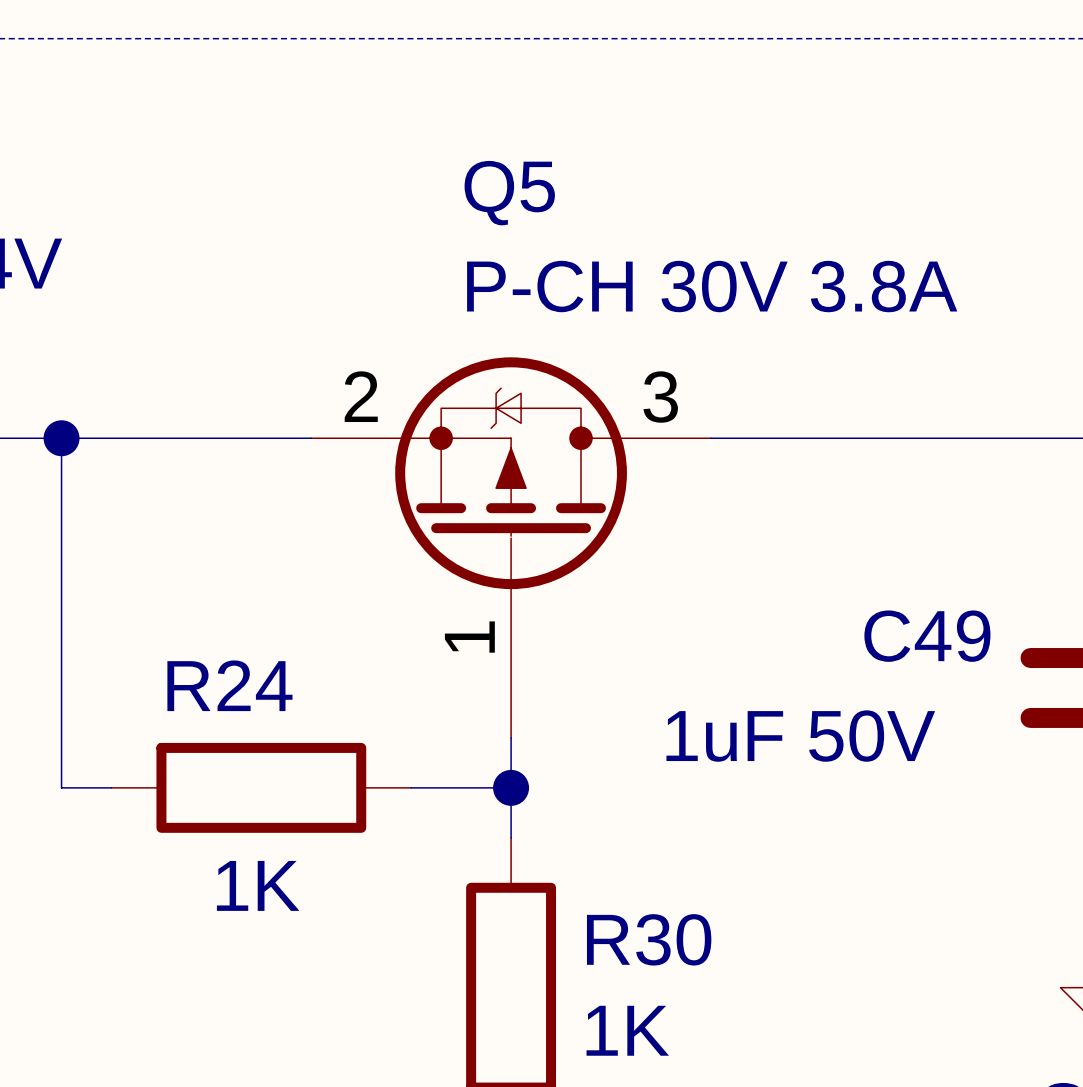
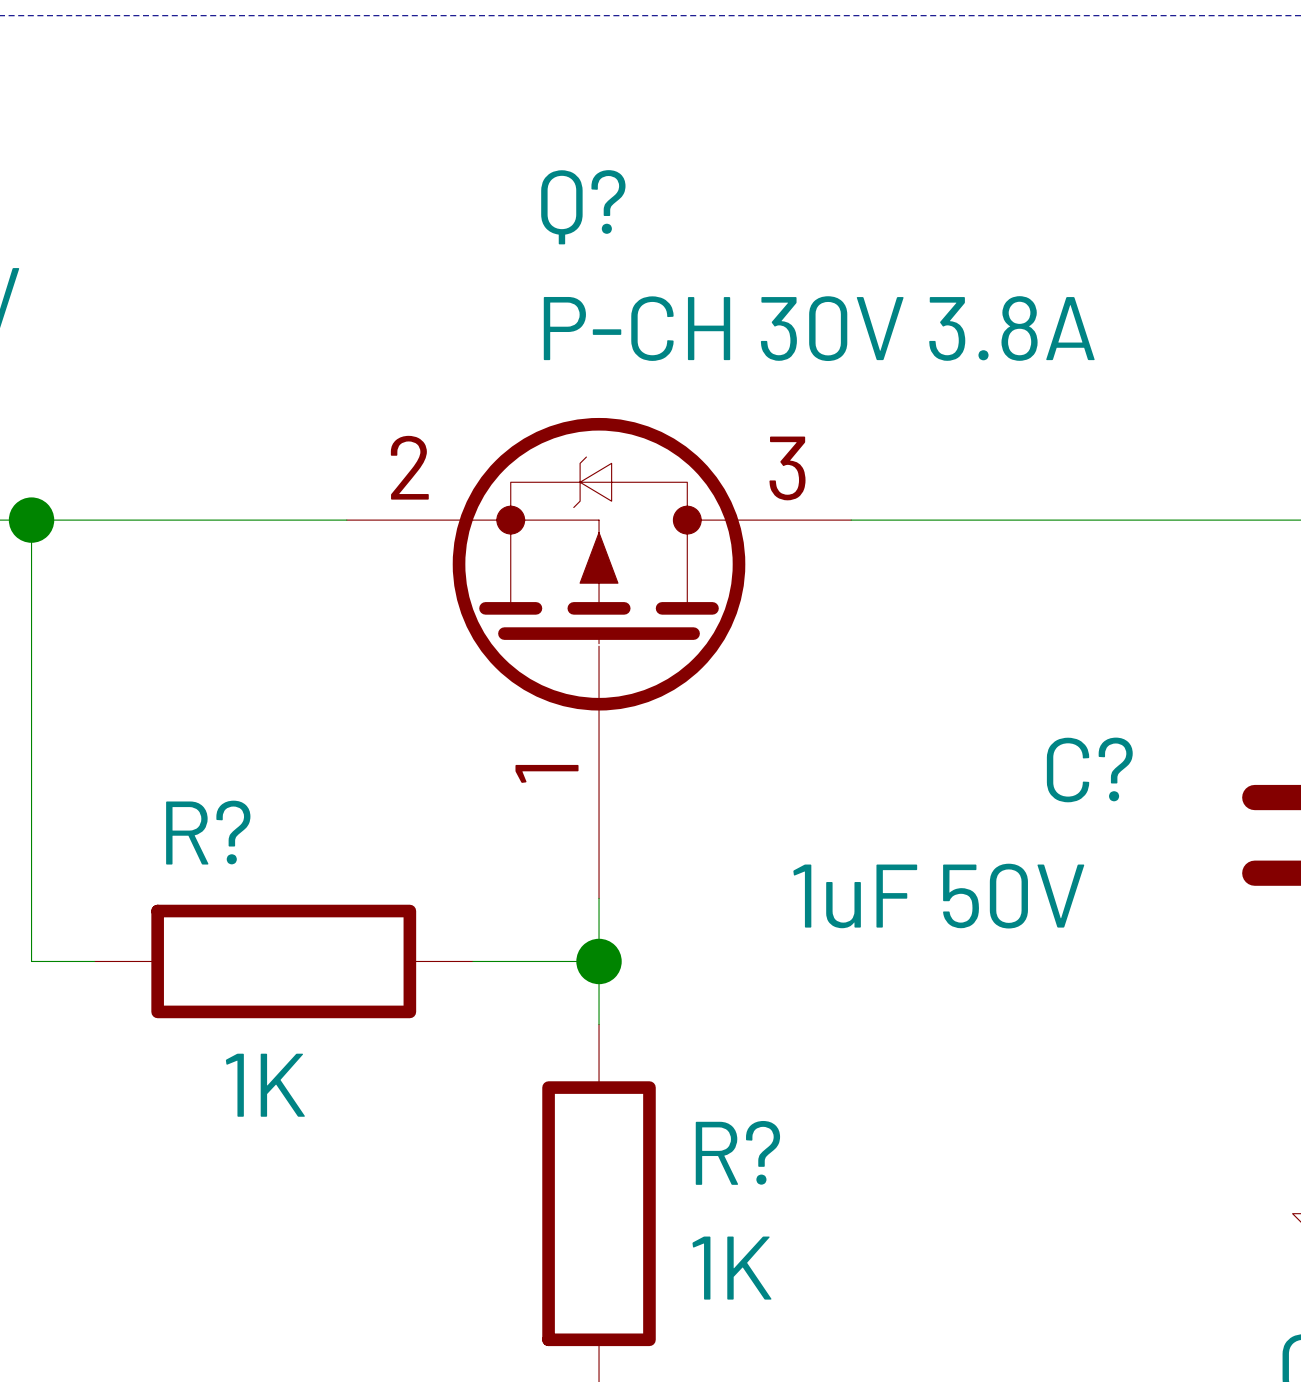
Q5 name: Q5 (509, 193) -> Q? (583, 207)
C49 name: C49 (927, 636) -> C? (1089, 769)
R24 name: R24 (229, 685) -> R? (208, 832)
R30 name: R30 (649, 939) -> R? (737, 1152)

